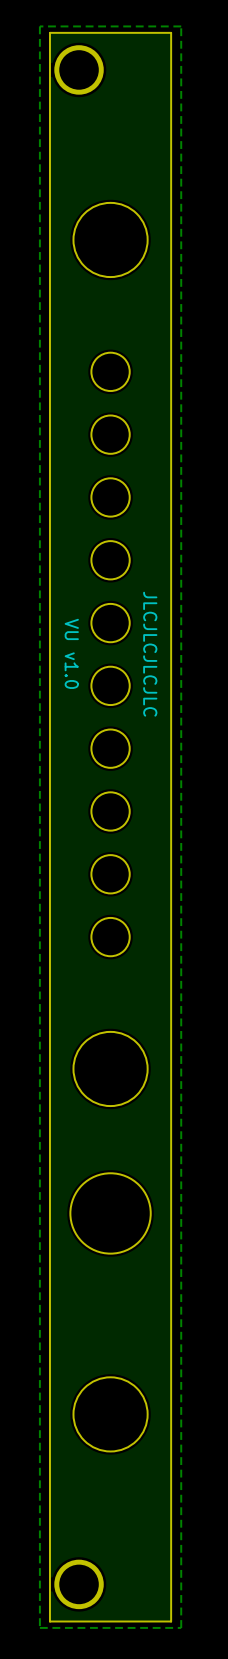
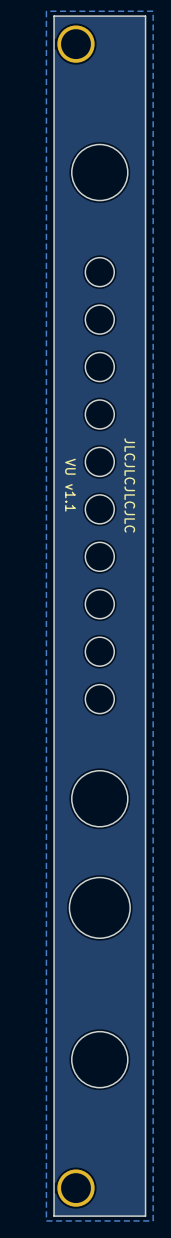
text: VU v1.0 (71, 653) -> VU v1.1 (70, 485)

